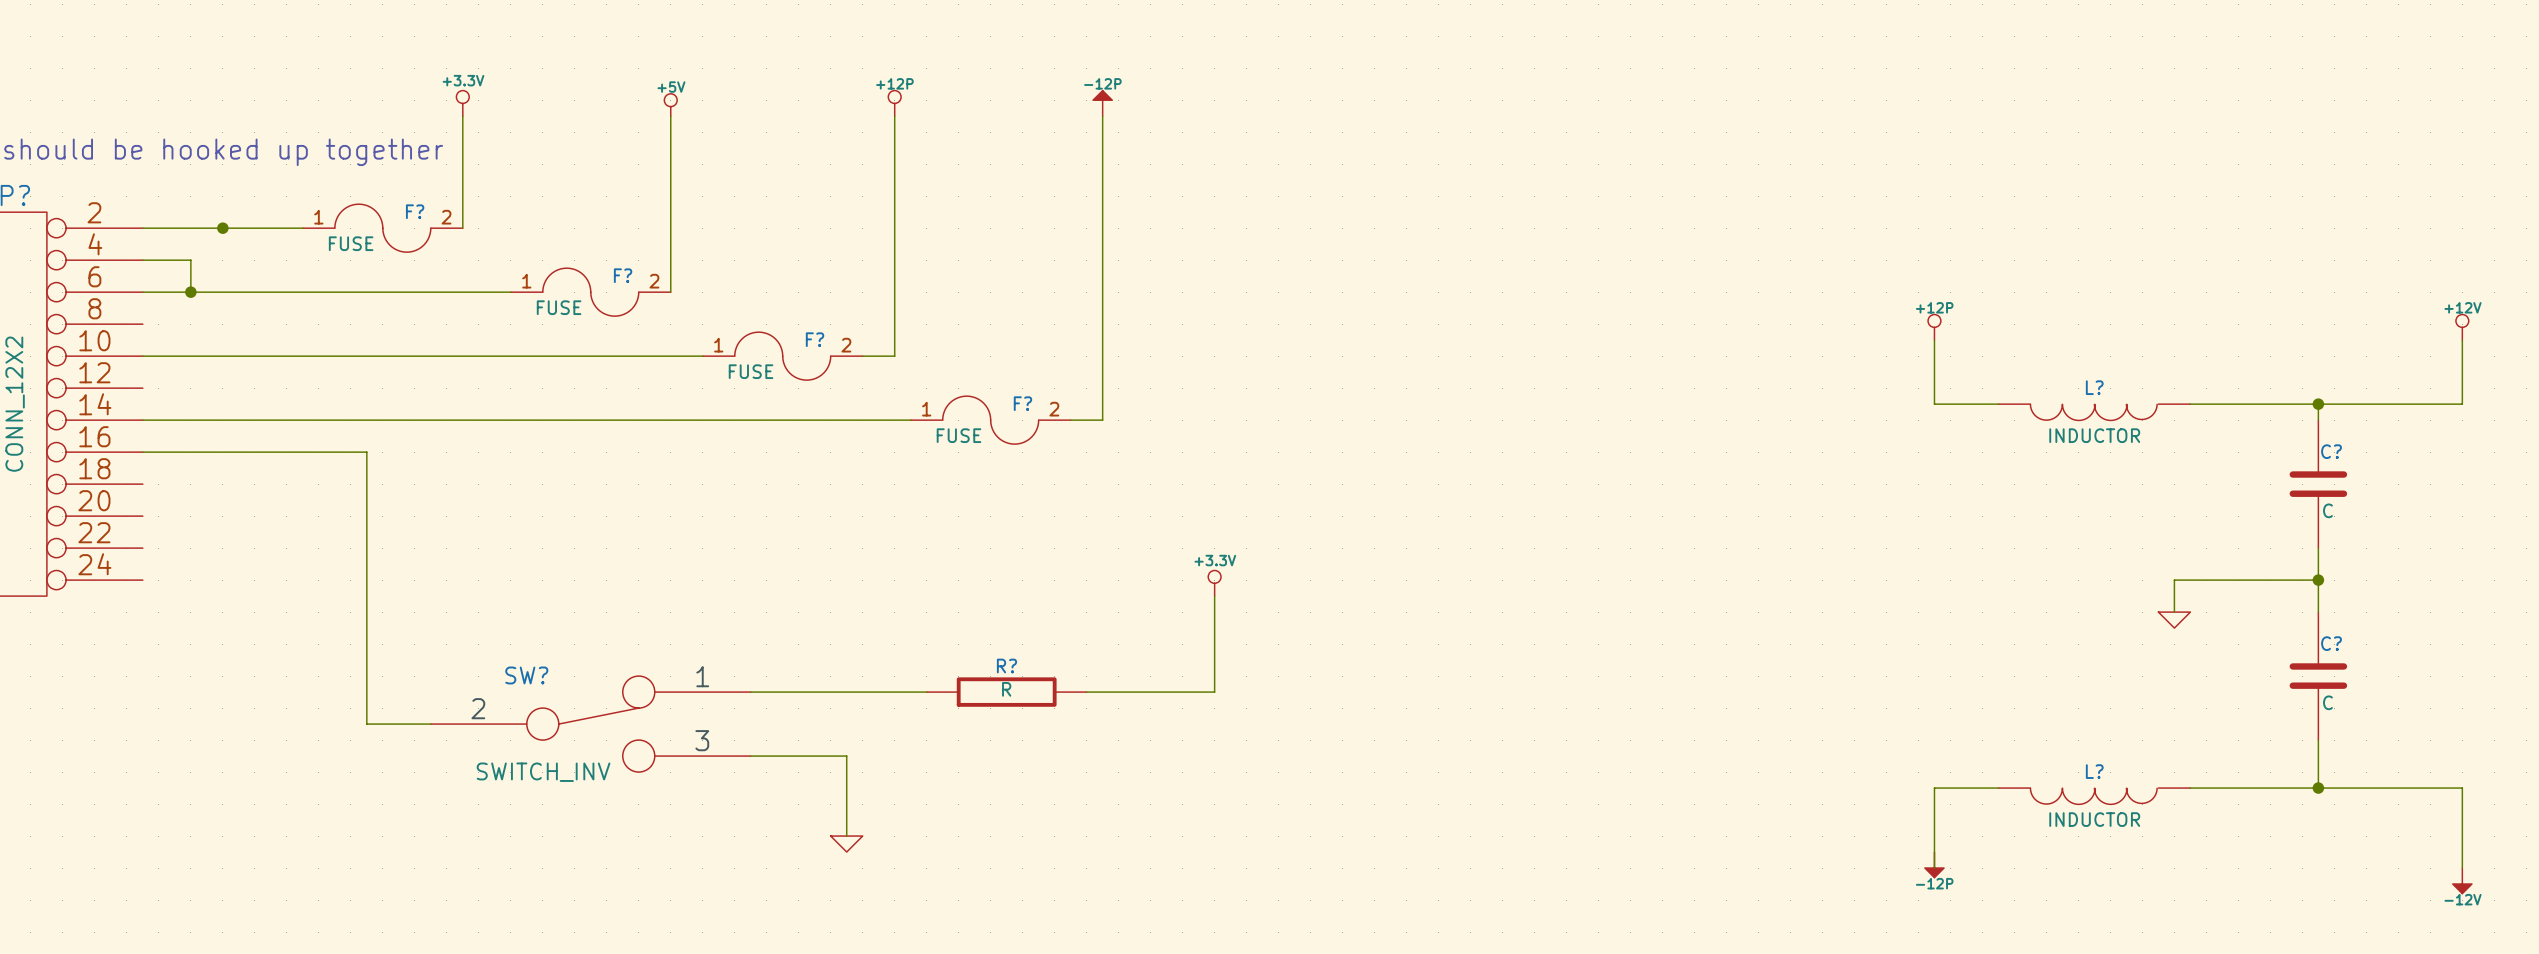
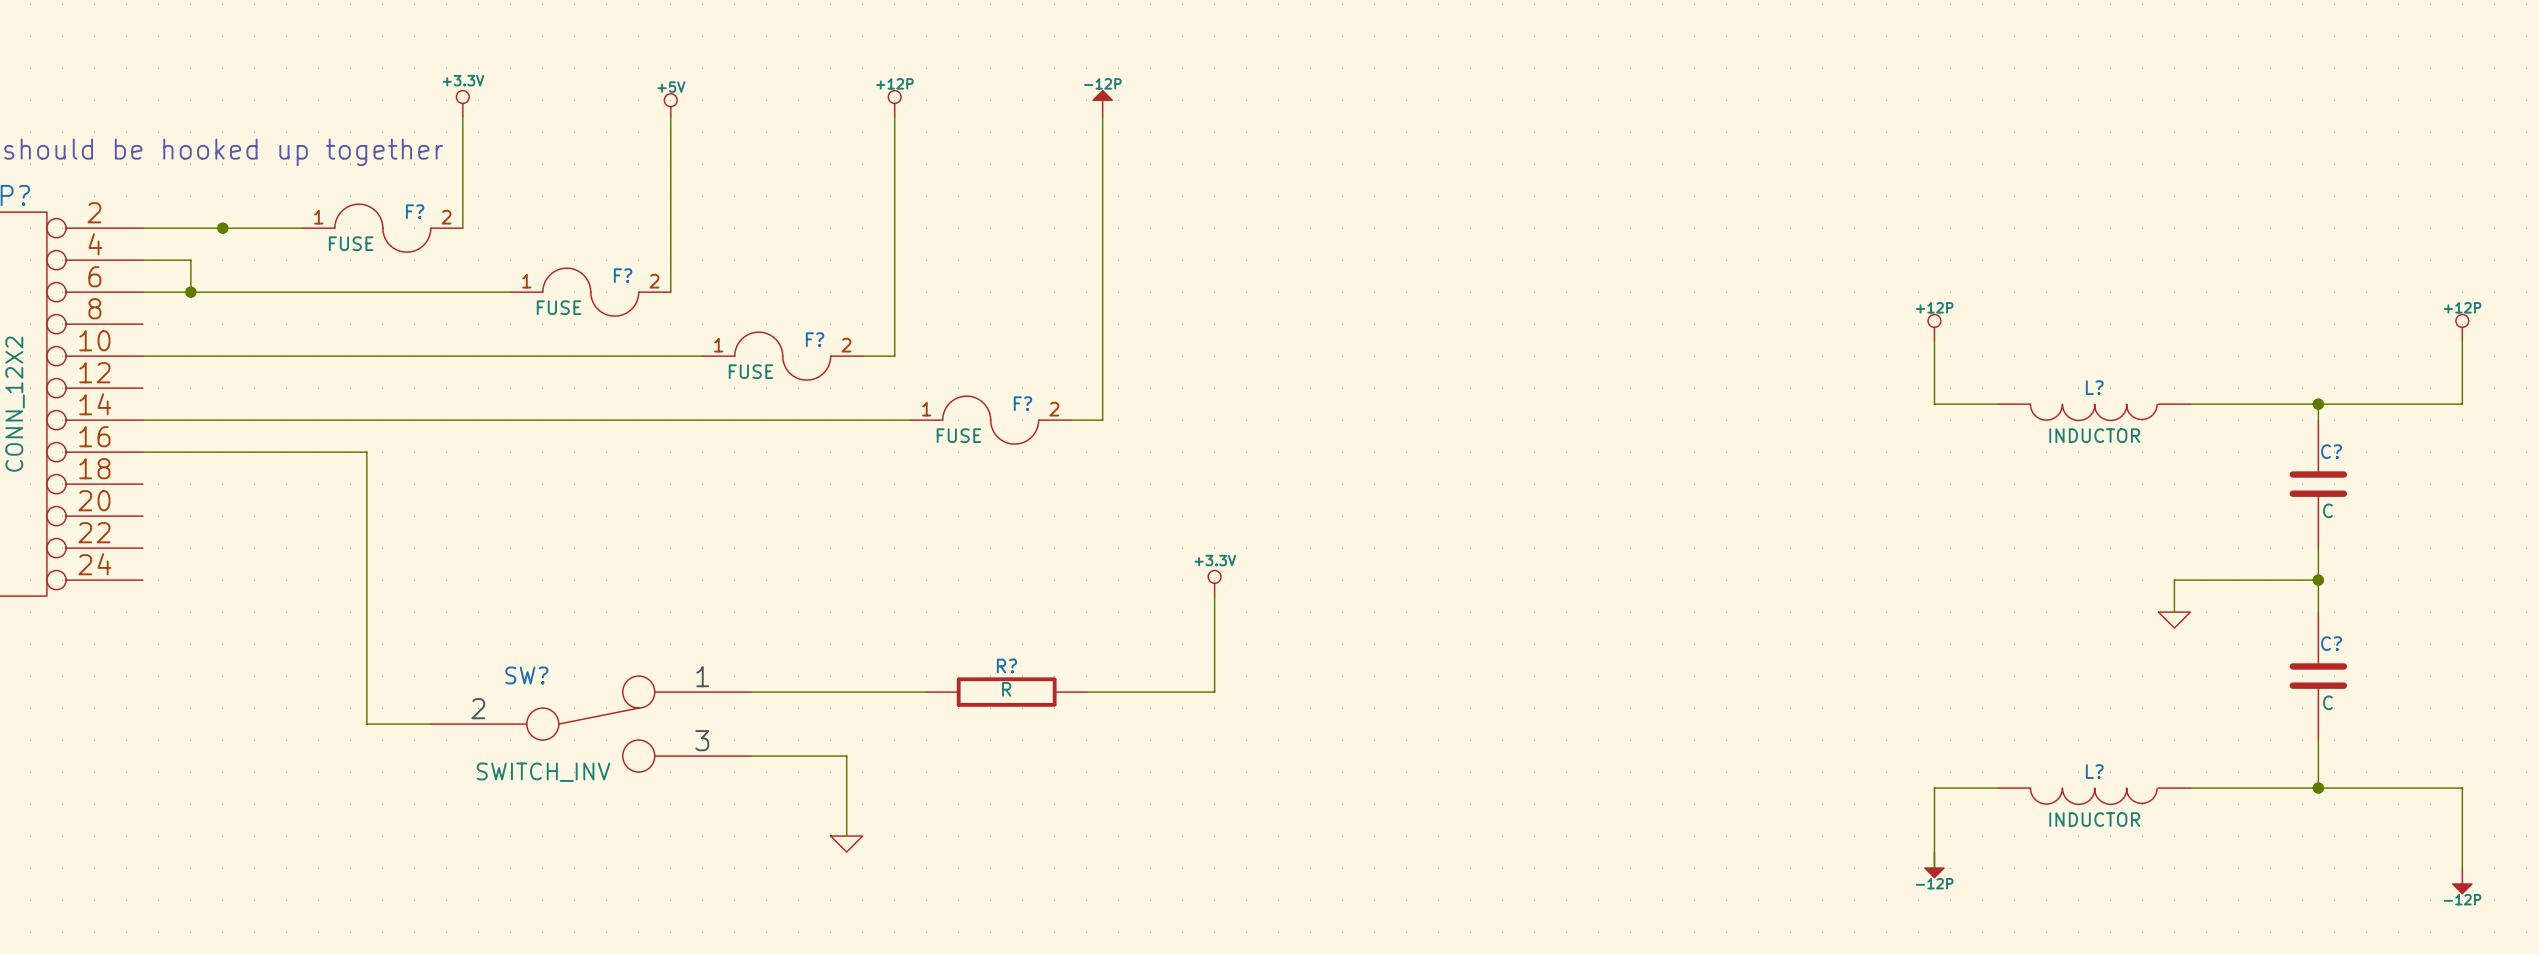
power symbol: +12V (2462, 327) -> +12P (2462, 327)
power symbol: -12V (2462, 880) -> -12P (2462, 880)

